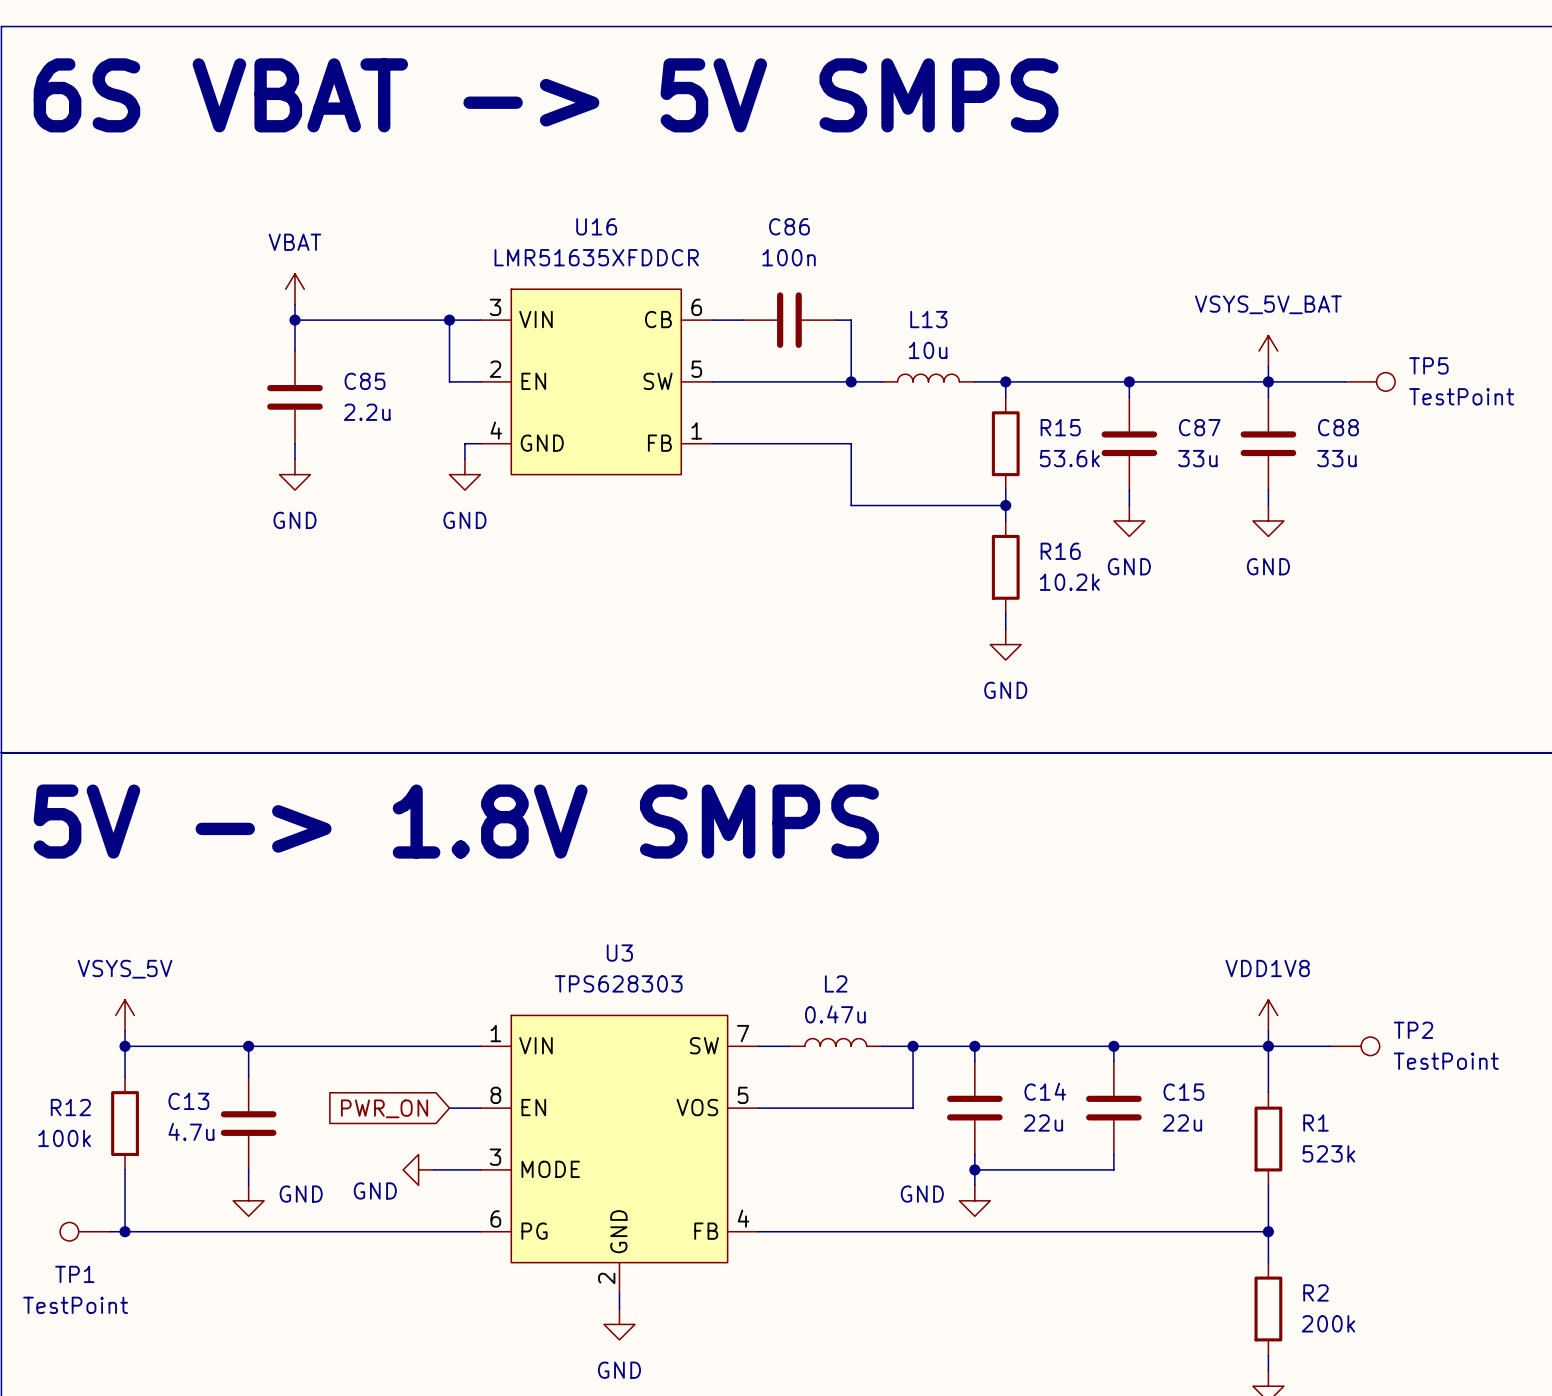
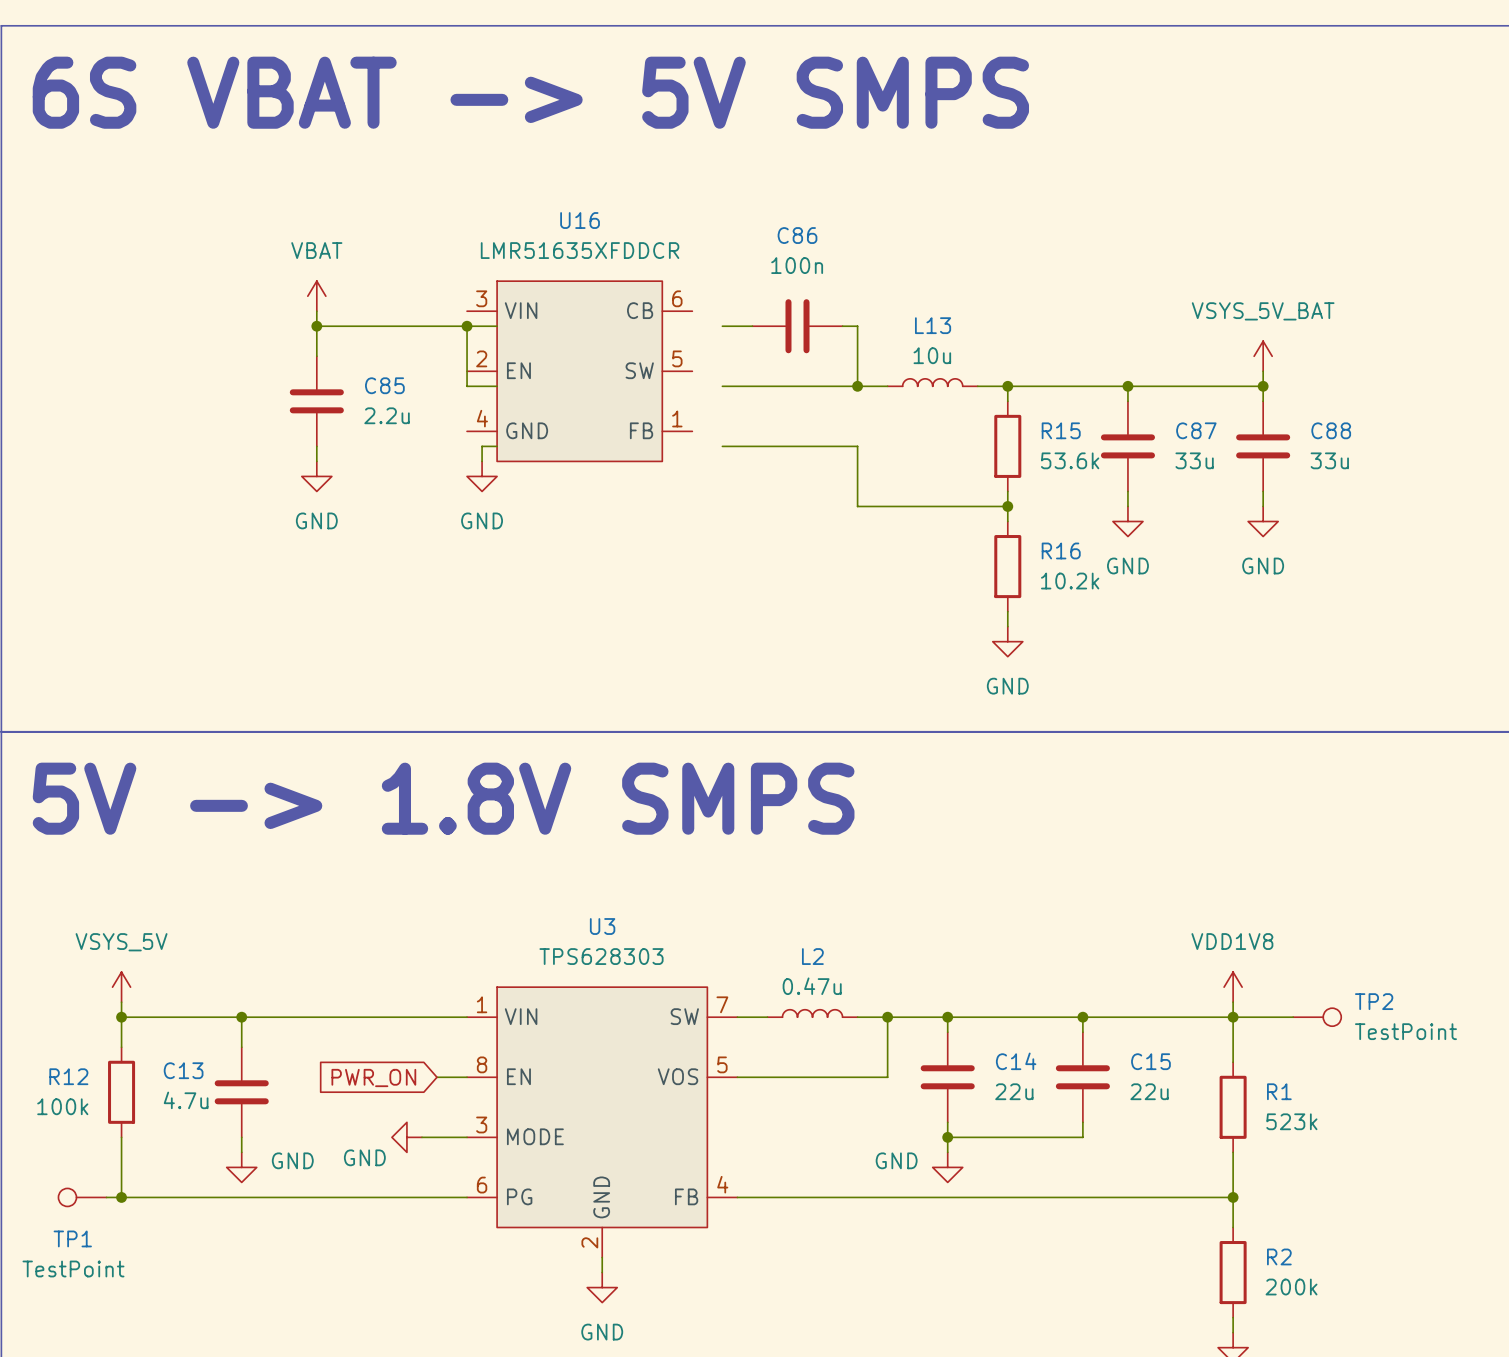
power symbol position: VBAT (294, 289) -> VBAT (316, 296)
wire: (294, 304) (294, 351) -> (316, 311) (316, 356)
wire: (294, 320) (480, 320) -> (316, 326) (497, 326)
junction position: (294, 320) -> (316, 326)
wire: (449, 320) (449, 381) (480, 381) -> (467, 326) (467, 386) (497, 386)
junction position: (449, 320) -> (467, 326)
wire: (712, 320) (743, 320) -> (722, 326) (752, 326)
C86 position: (789, 320) -> (797, 326)
wire: (835, 320) (851, 320) (851, 381) -> (842, 326) (857, 326) (857, 386)
power symbol position: VSYS_5V_BAT (1268, 351) -> VSYS_5V_BAT (1263, 356)
wire: (1268, 366) (1268, 397) -> (1263, 371) (1263, 401)
L13 position: (928, 378) -> (932, 382)
wire: (712, 381) (882, 381) -> (722, 386) (887, 386)
junction position: (851, 381) -> (857, 386)
wire: (974, 381) (1345, 381) -> none
wire: (1005, 381) (1005, 397) -> (1263, 386) (977, 386)
junction position: (1005, 381) -> (1007, 386)
wire: (1129, 381) (1129, 397) -> (1127, 386) (1127, 401)
junction position: (1129, 381) -> (1127, 386)
junction position: (1268, 381) -> (1263, 386)
TP5: TestPoint (1370, 381) -> none
C85 position: (294, 397) -> (316, 401)
wire: none -> (1007, 386) (1007, 401)
wire: (294, 443) (294, 459) -> (316, 446) (316, 461)
wire: (480, 443) (464, 443) (464, 459) -> (497, 446) (482, 446) (482, 461)
wire: (712, 443) (851, 443) (851, 505) (1005, 505) -> (722, 446) (857, 446) (857, 506) (1007, 506)
R15 position: (1005, 443) -> (1007, 446)
C87 position: (1129, 443) -> (1127, 446)
C88 position: (1268, 443) -> (1263, 446)
power symbol position: GND (294, 474) -> GND (316, 476)
power symbol position: GND (464, 474) -> GND (482, 476)
wire: (1005, 490) (1005, 520) -> (1007, 491) (1007, 521)
wire: (1129, 490) (1129, 505) -> (1127, 491) (1127, 506)
wire: (1268, 490) (1268, 505) -> (1263, 491) (1263, 506)
junction position: (1005, 505) -> (1007, 506)
power symbol position: GND (1129, 520) -> GND (1127, 521)
power symbol position: GND (1268, 520) -> GND (1263, 521)
R16 position: (1005, 567) -> (1007, 566)
wire: (1005, 613) (1005, 629) -> (1007, 611) (1007, 626)
power symbol position: GND (1005, 644) -> GND (1007, 641)

